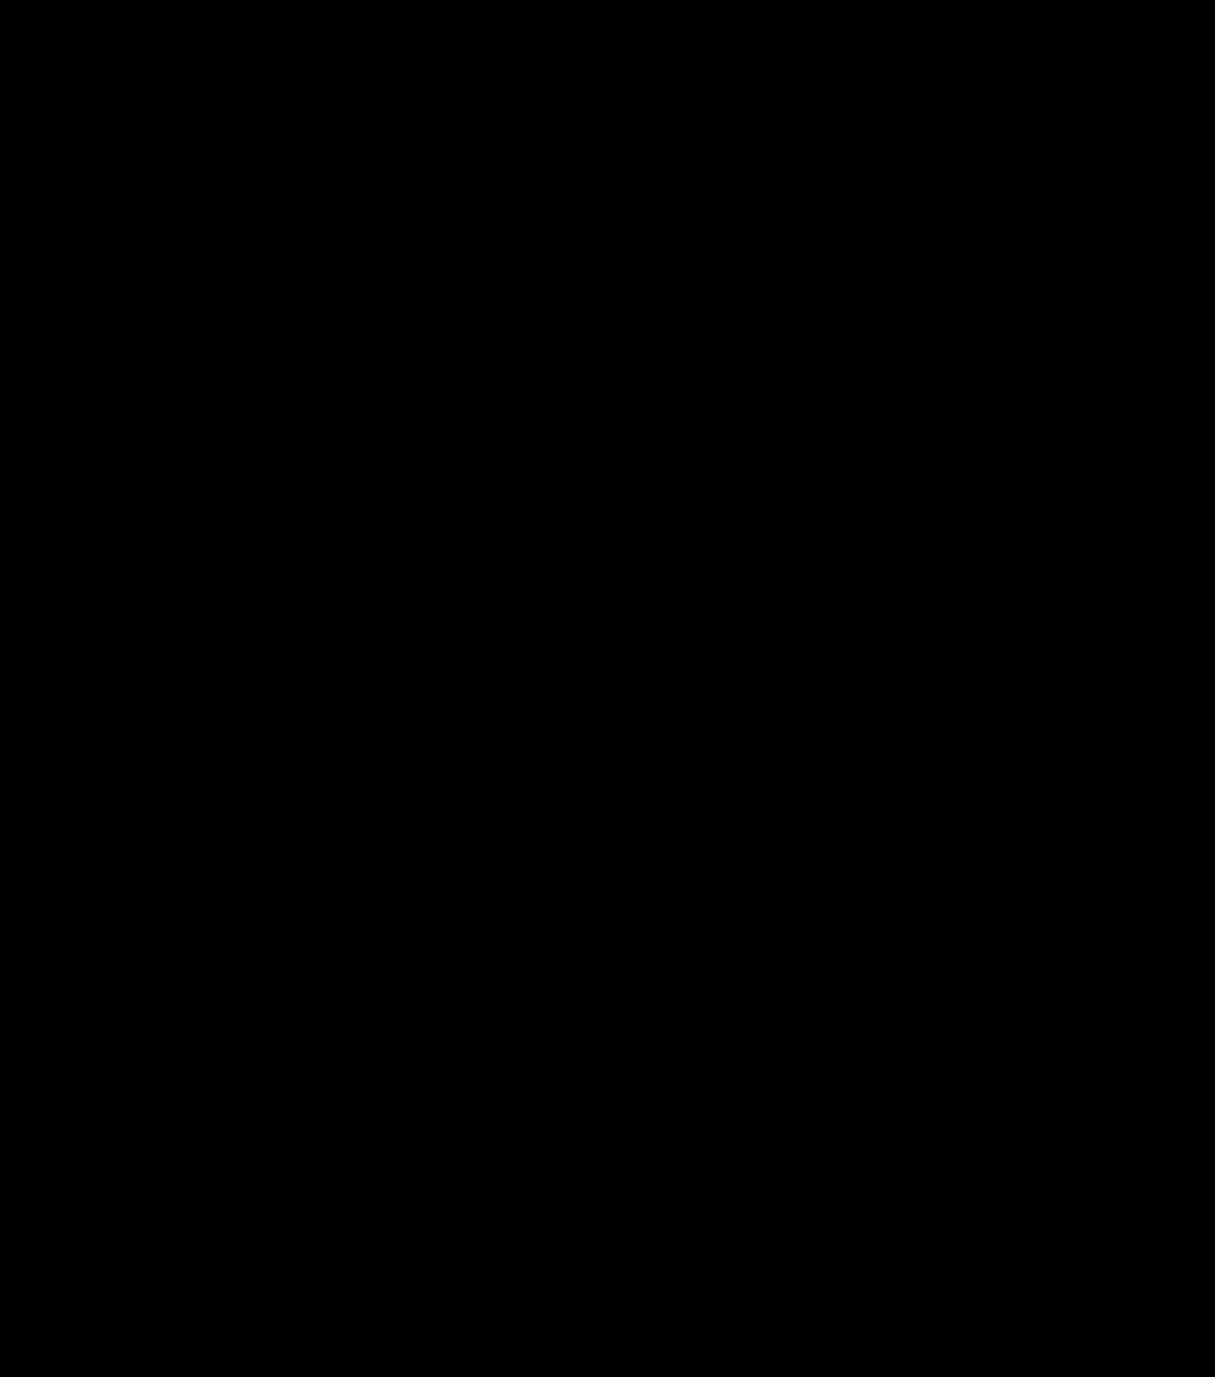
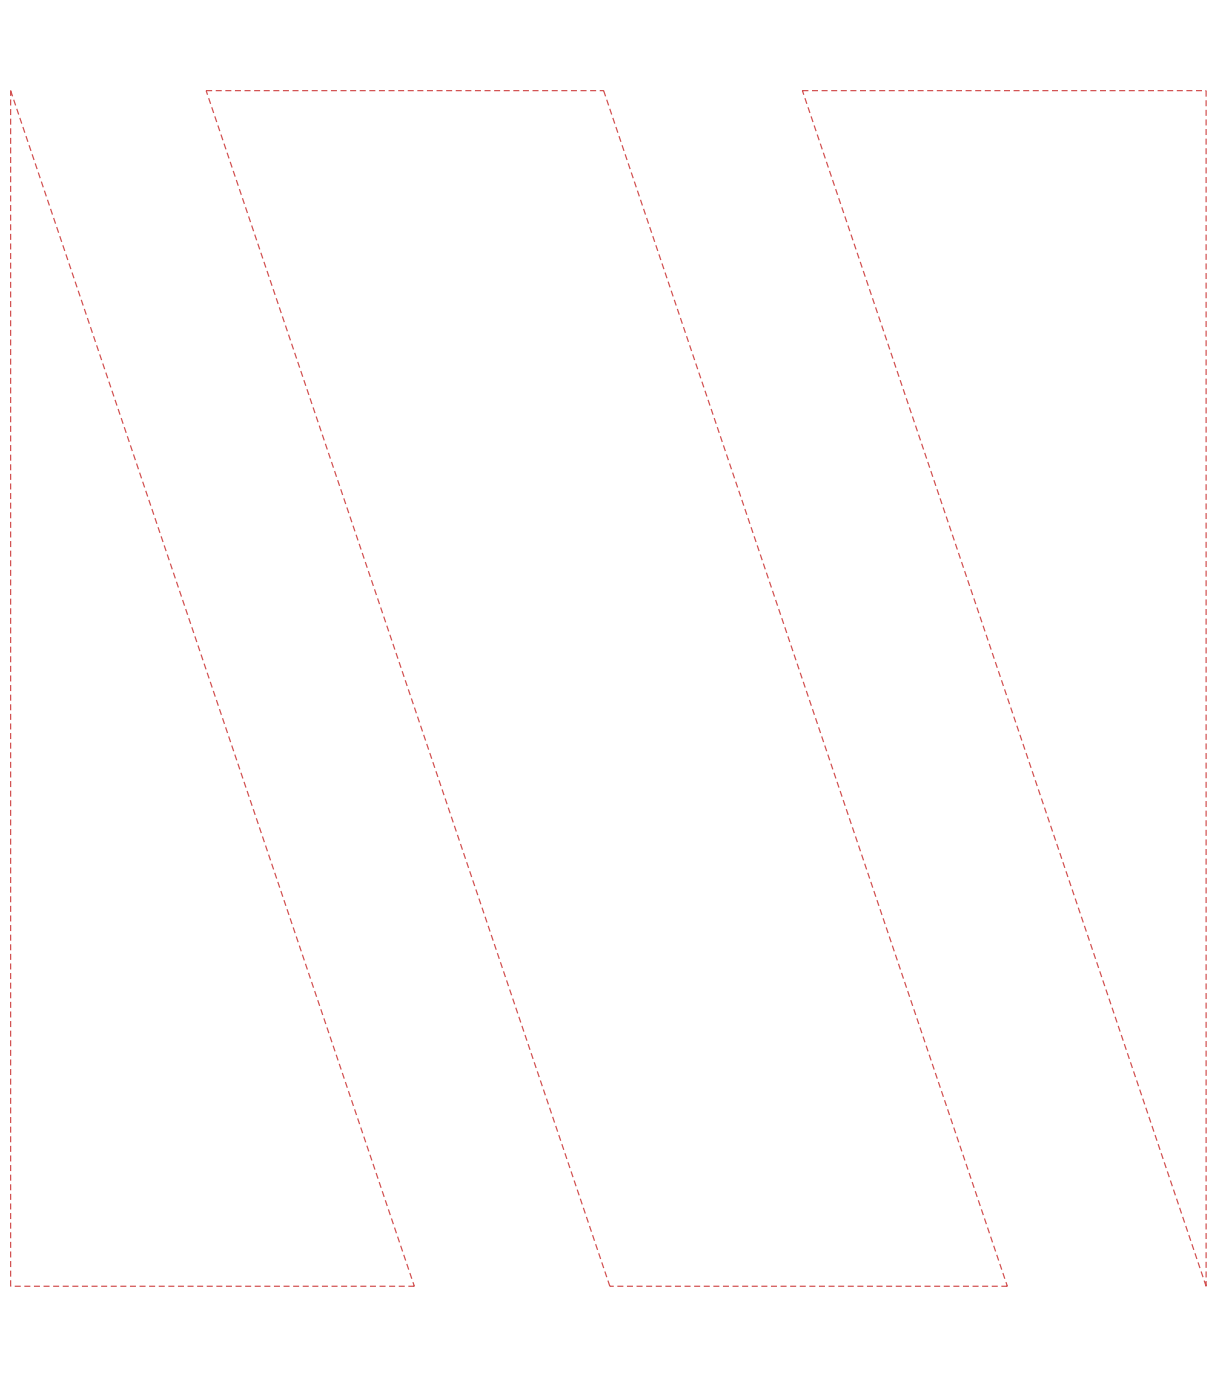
top zone outline: none -> (10, 90) (414, 1286) (10, 1286) (10, 90)
top zone outline: none -> (206, 90) (603, 90) (1007, 1286) (609, 1286) (206, 90)
top zone outline: none -> (802, 90) (1206, 1286) (1206, 90) (802, 90)

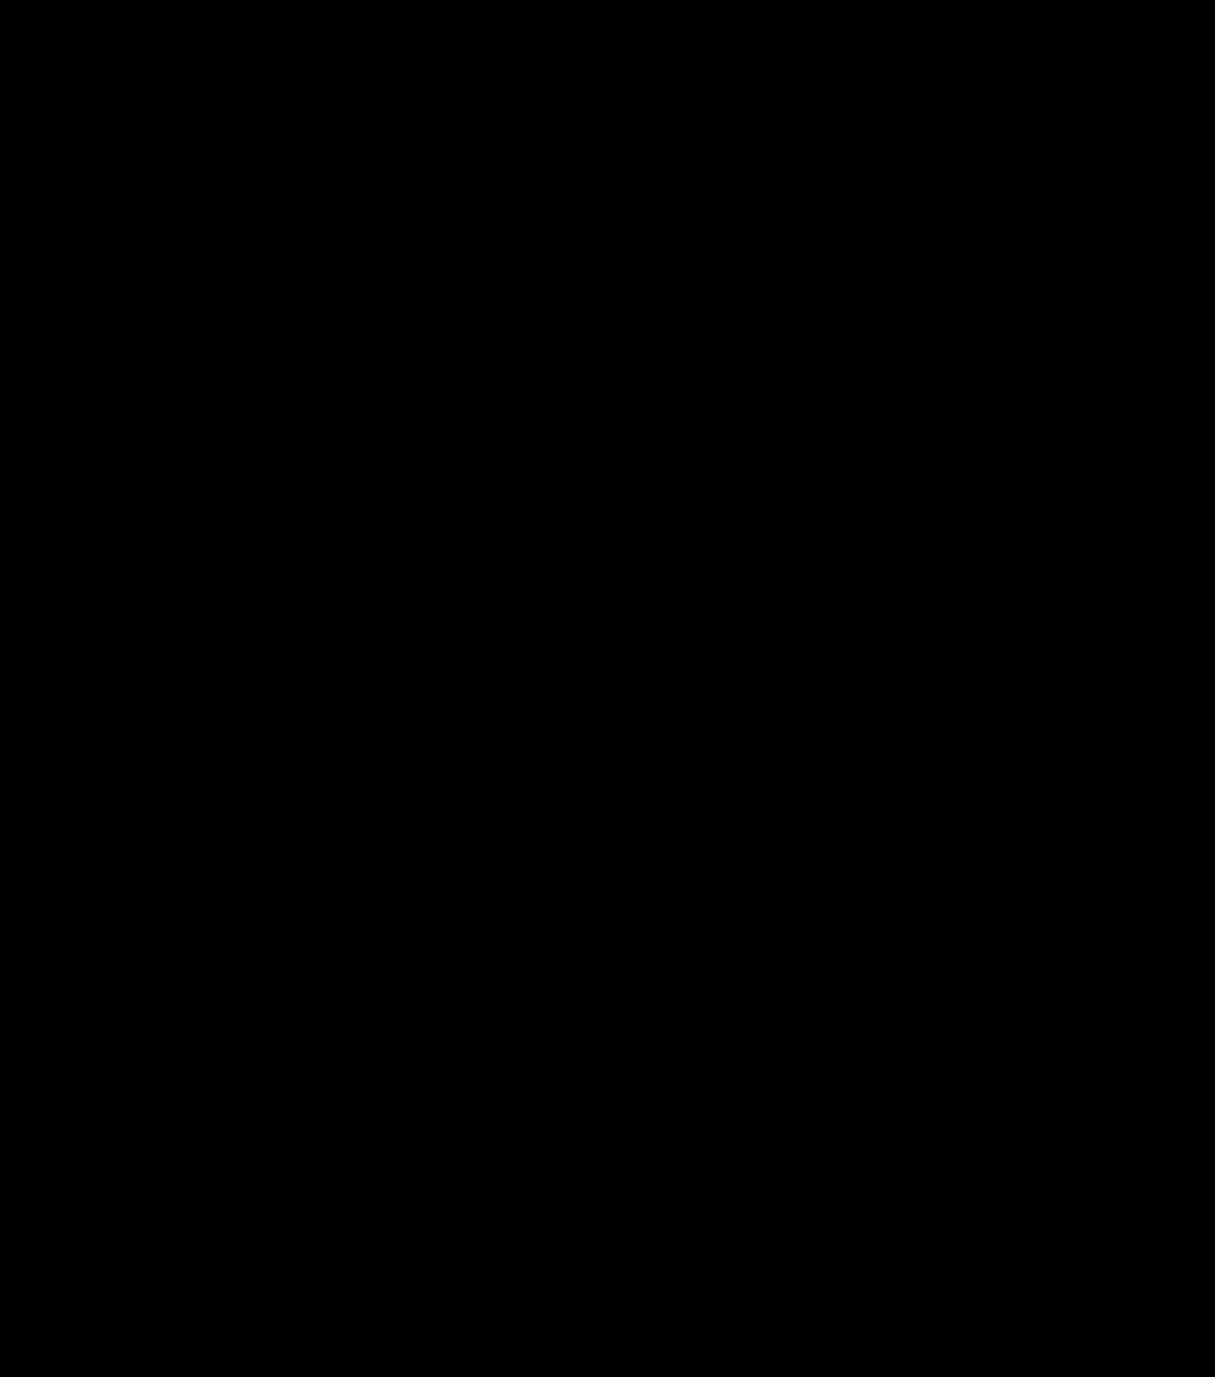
top zone outline: (10, 90) (414, 1286) (10, 1286) (10, 90) -> none
top zone outline: (206, 90) (603, 90) (1007, 1286) (609, 1286) (206, 90) -> none
top zone outline: (802, 90) (1206, 1286) (1206, 90) (802, 90) -> none

